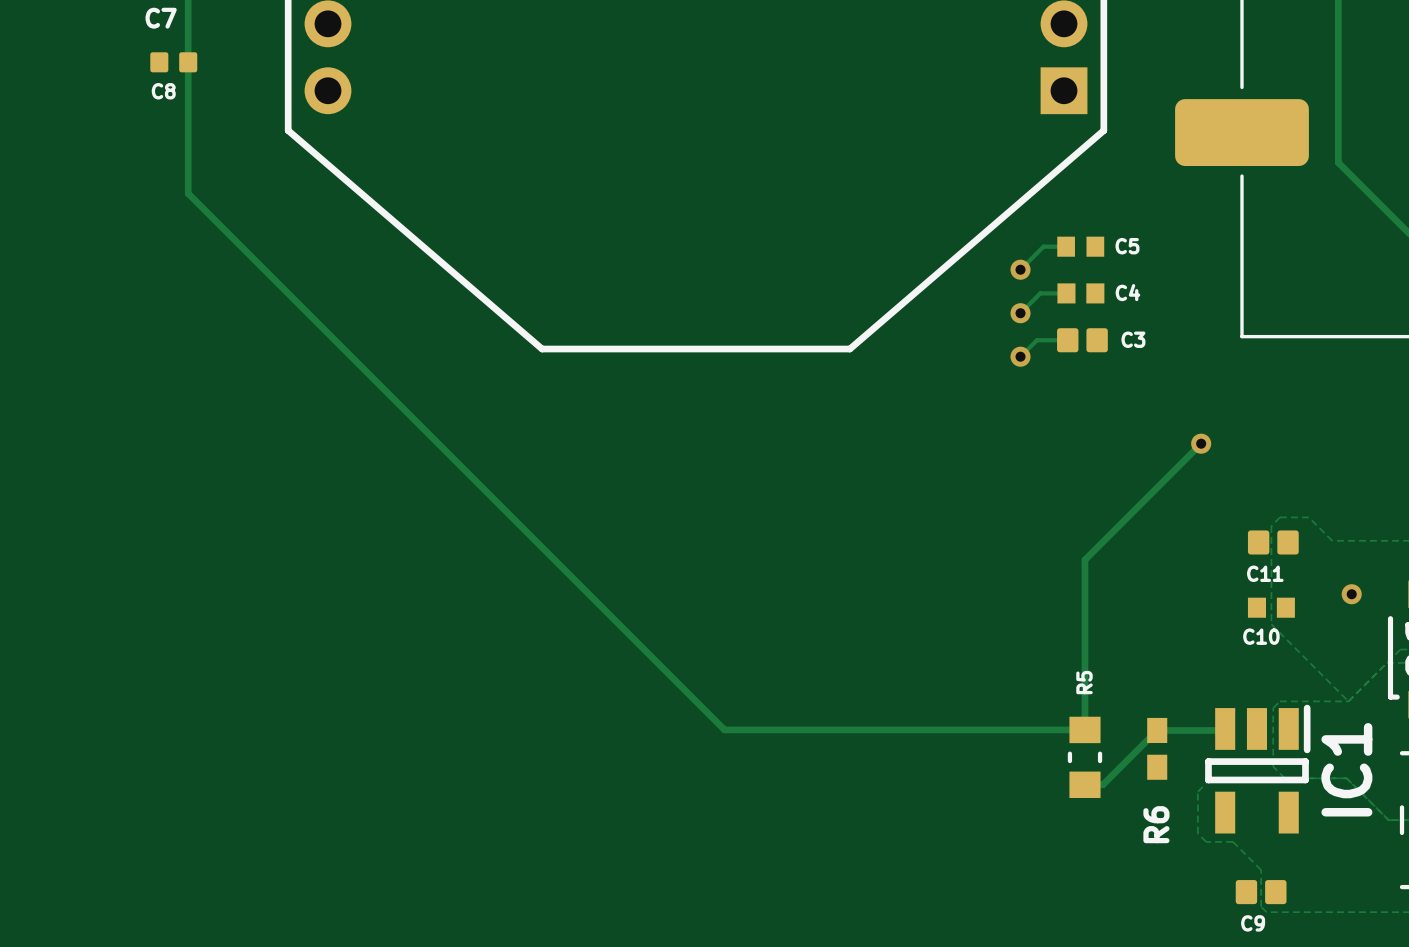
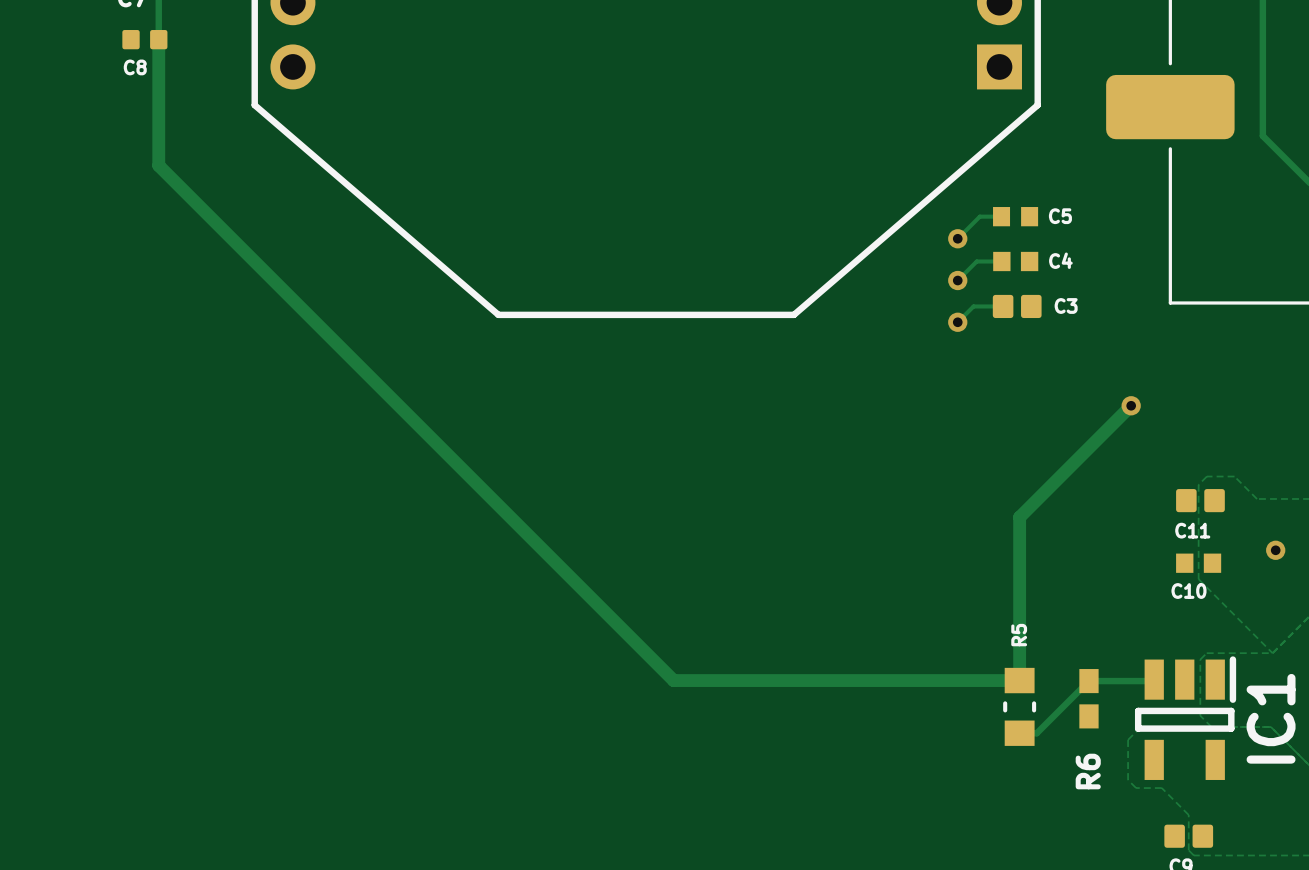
track width: thin (188, 62) (188, 193) (724, 729) (1084, 729) (1084, 559) (1201, 443) -> thick (158, 39) (158, 165) (673, 680) (1019, 680) (1019, 517) (1131, 405)

